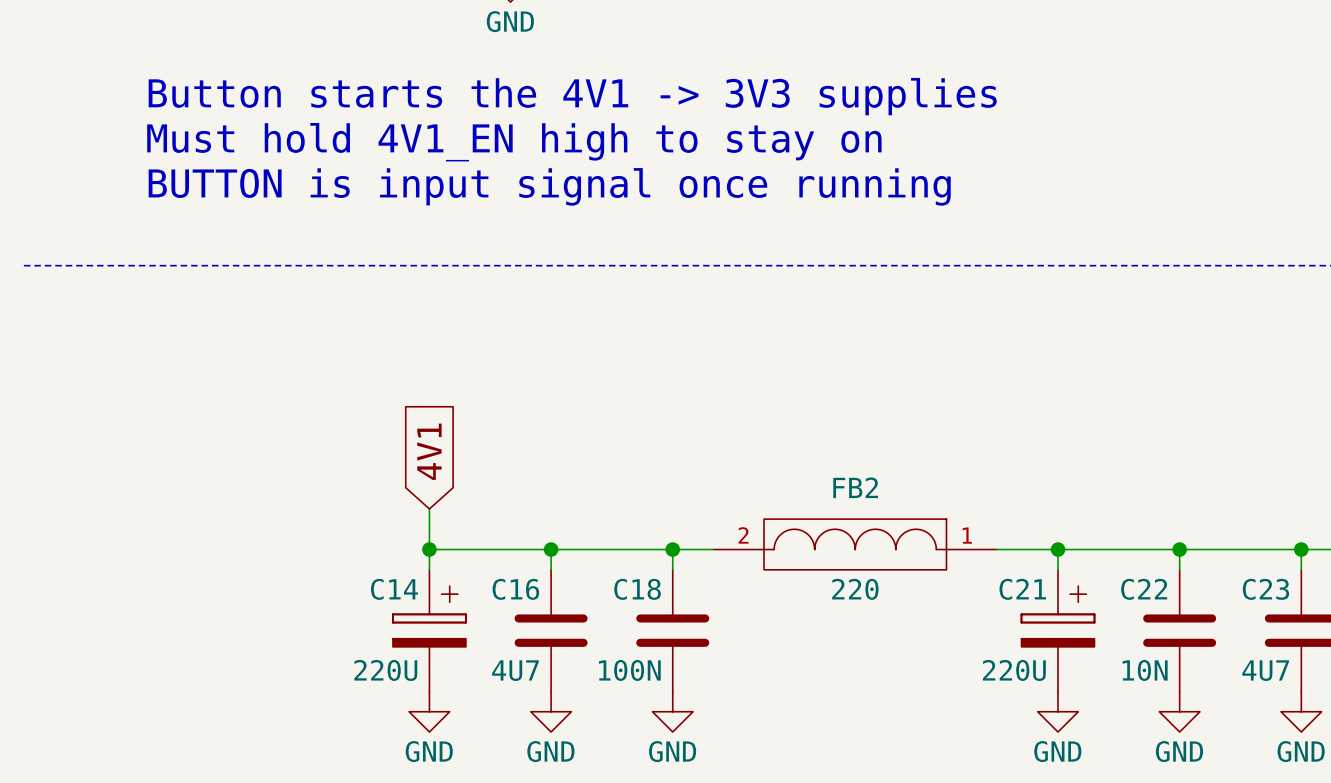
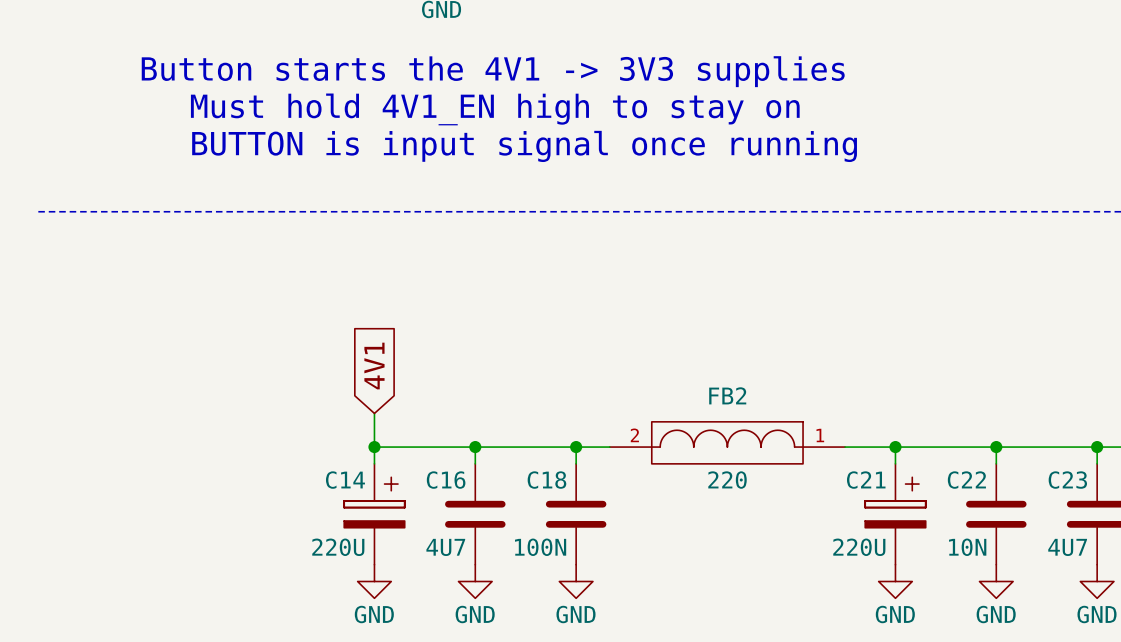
text position: Must hold 4V1_EN high to stay on (514, 142) -> Must hold 4V1_EN high to stay on (495, 109)
text position: BUTTON is input signal once running (549, 186) -> BUTTON is input signal once running (524, 146)

